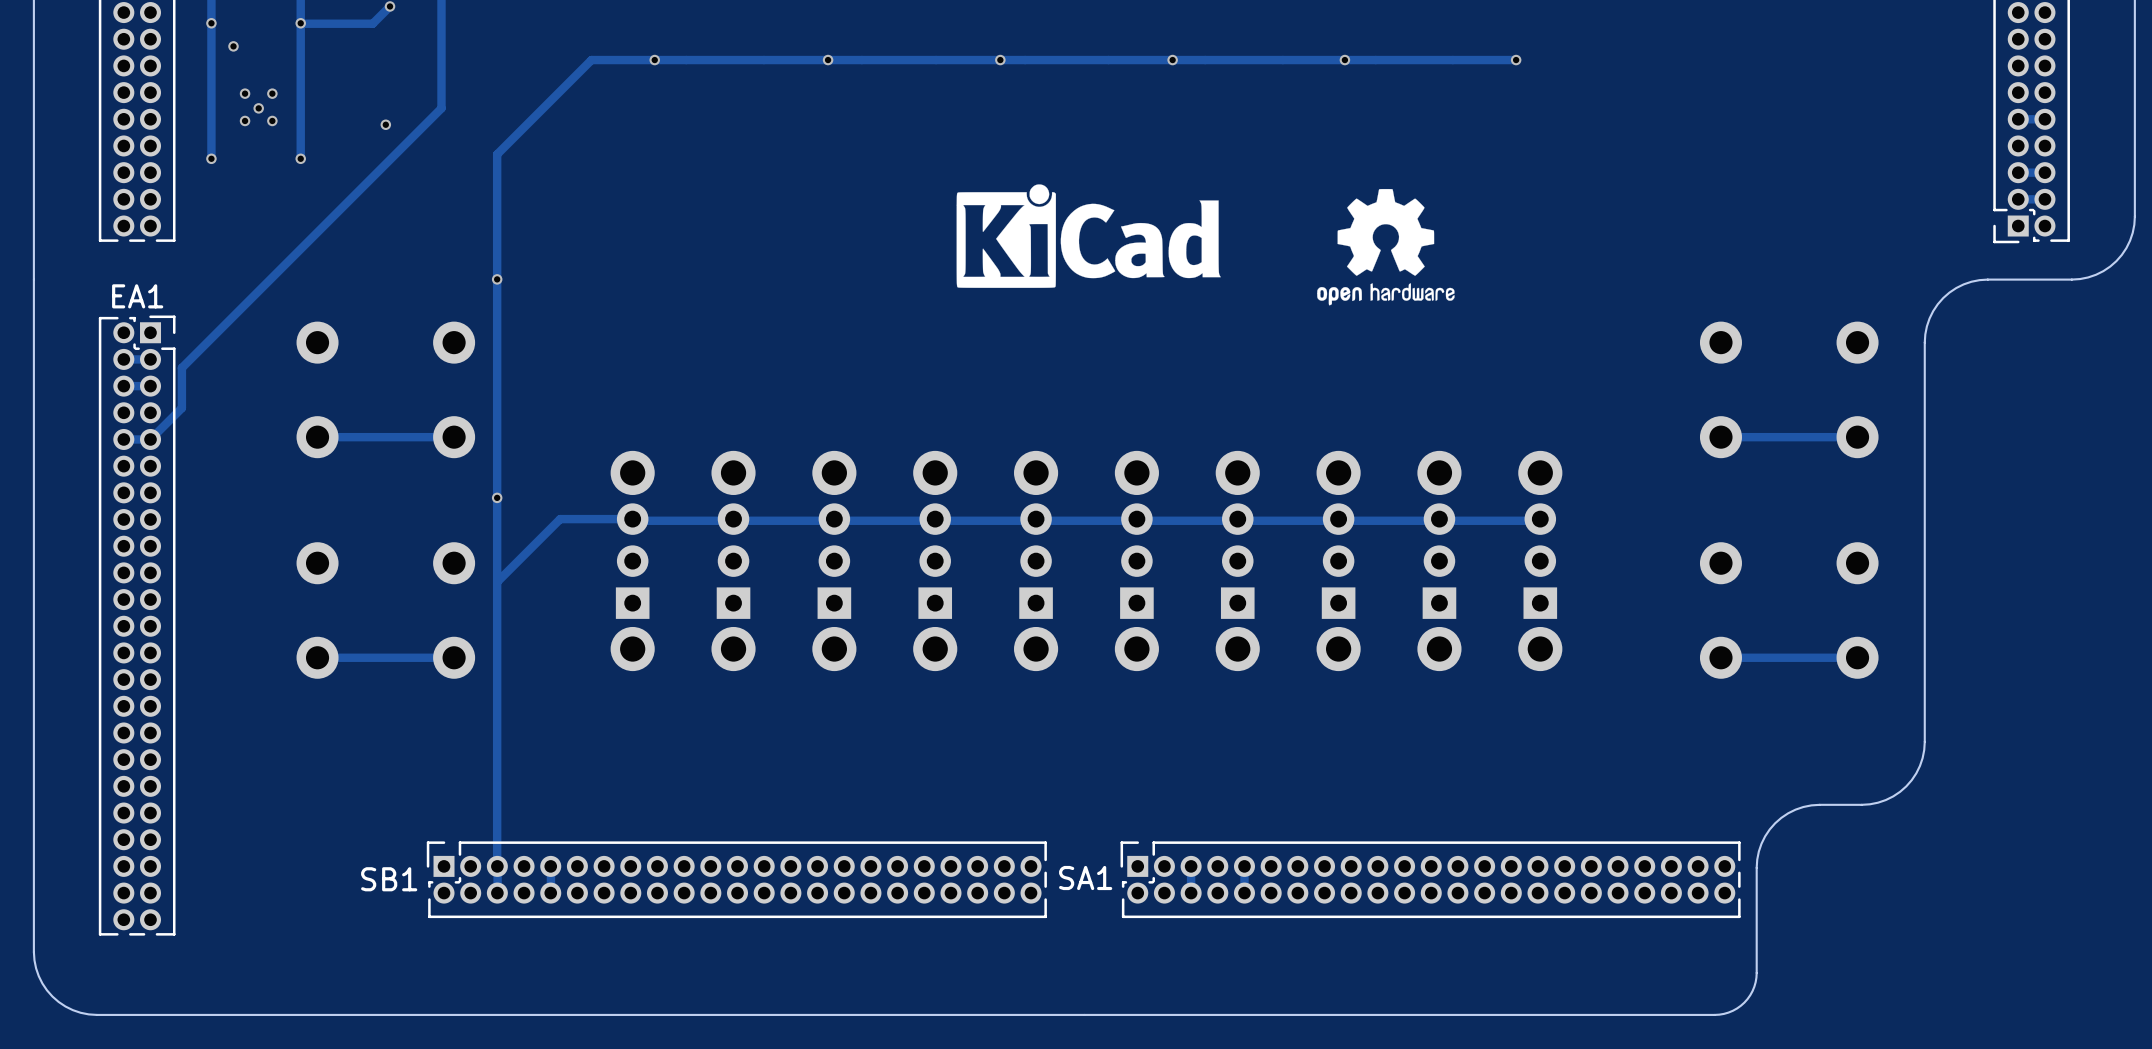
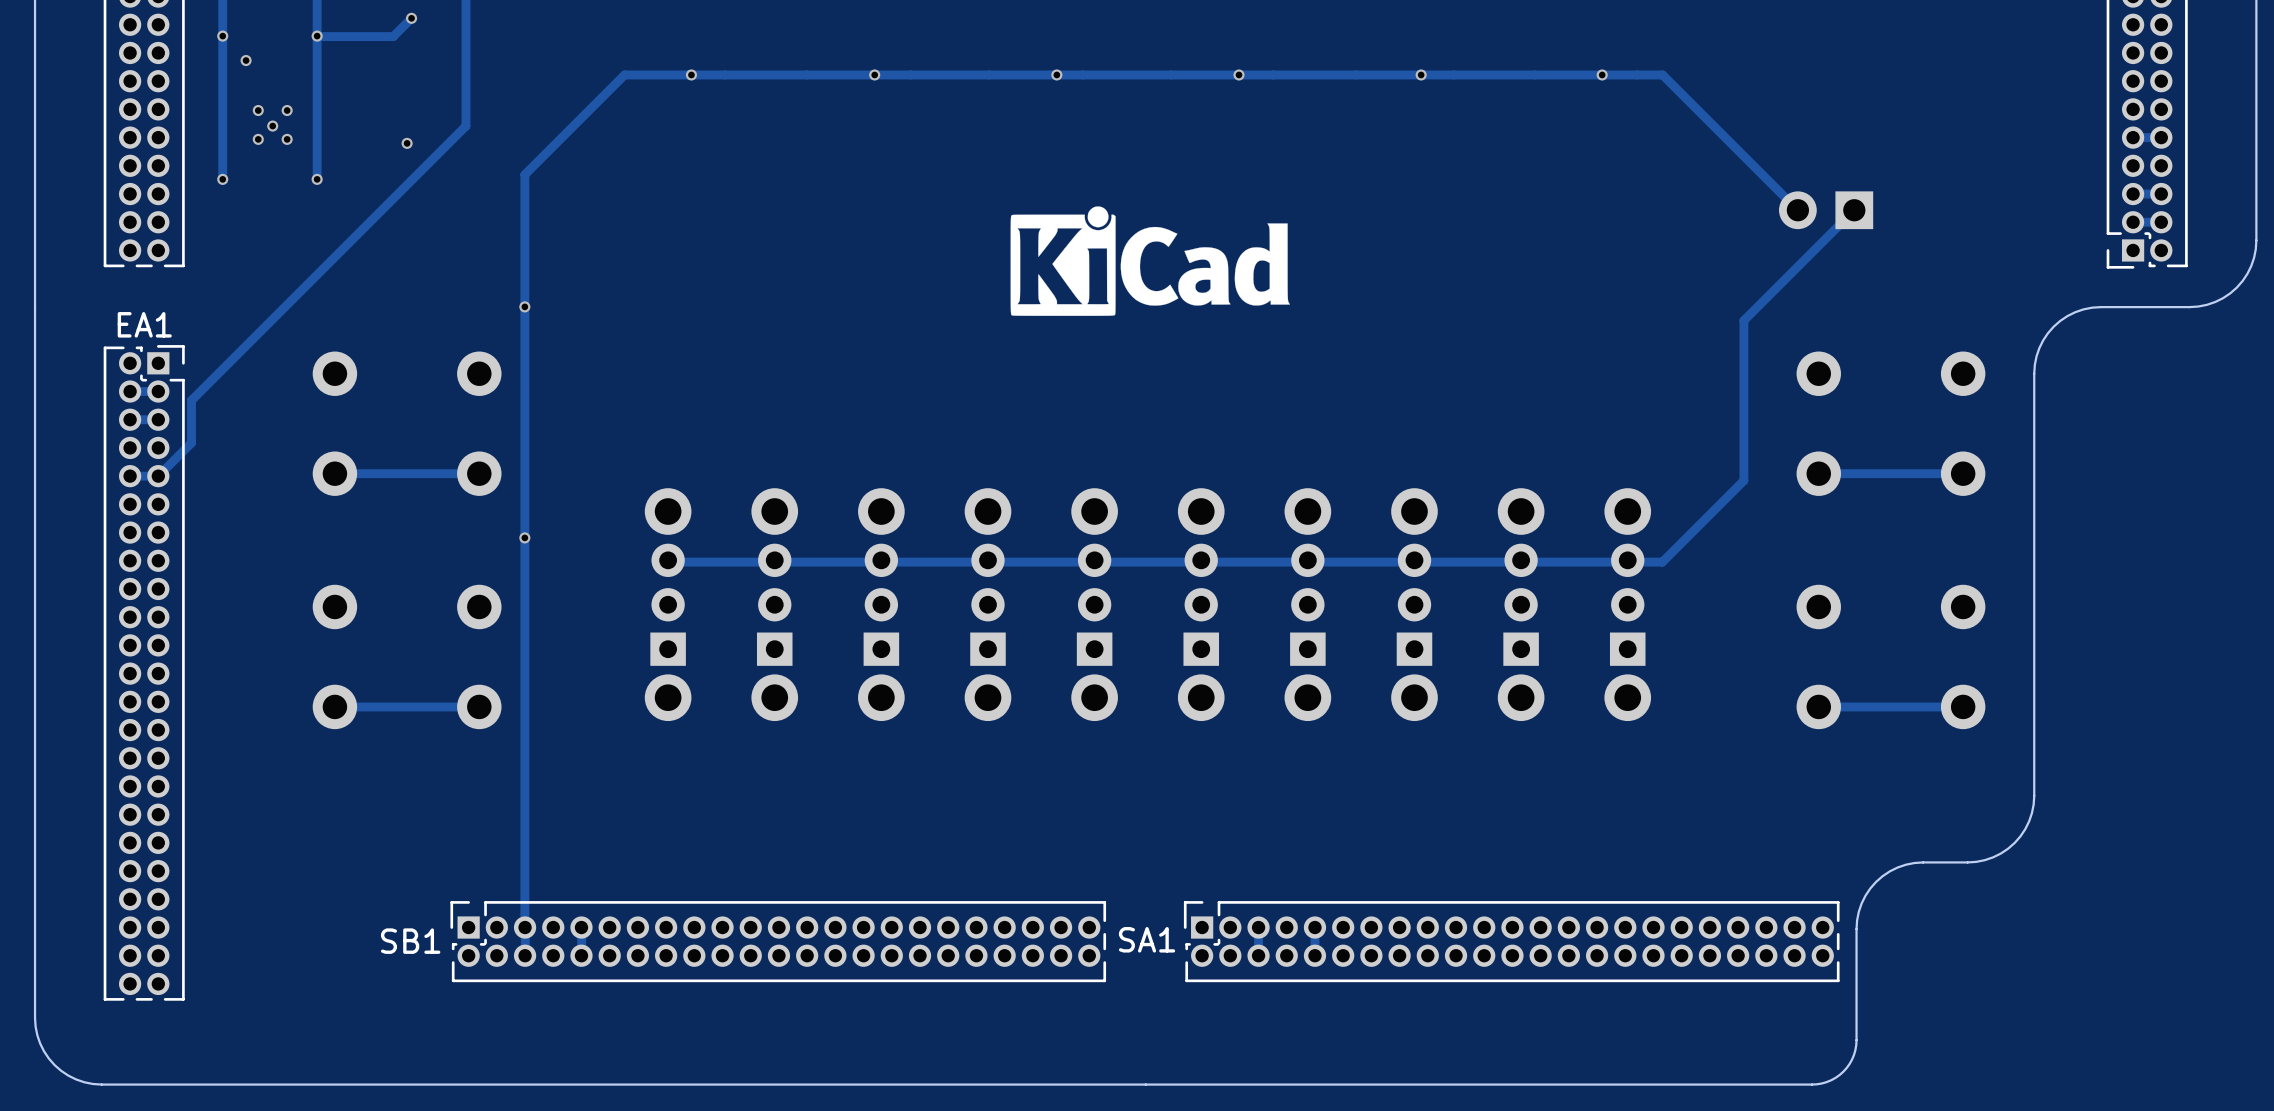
track: none -> (1600, 74) (1662, 74) (1797, 210)
part: none -> (1826, 210)
track: none -> (1854, 210) (1743, 320) (1743, 480) (1662, 562) (1630, 562)
drawing: [1317, 188, 1455, 306] -> none
track: (632, 519) (560, 519) (497, 582) -> none

